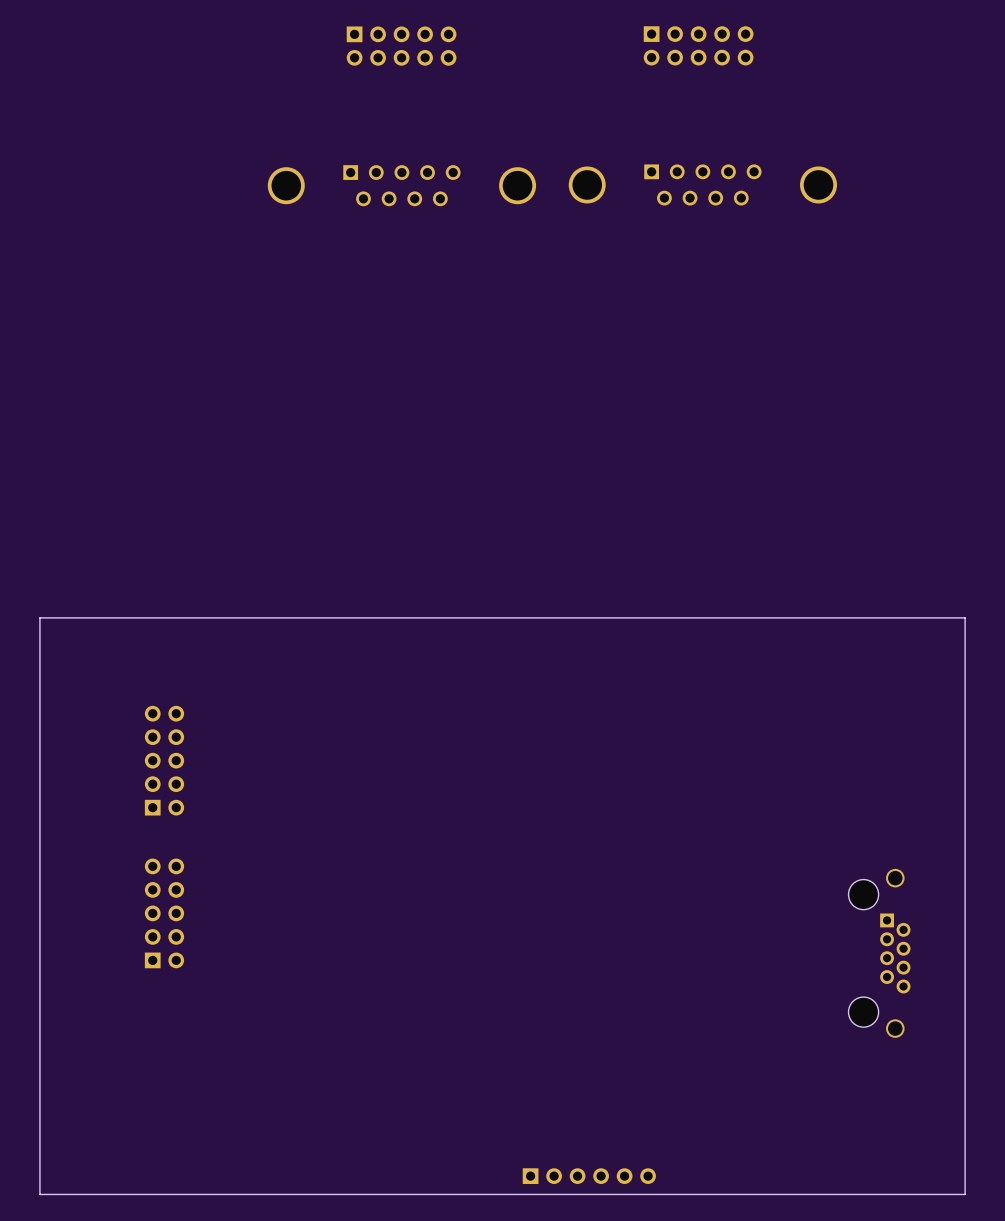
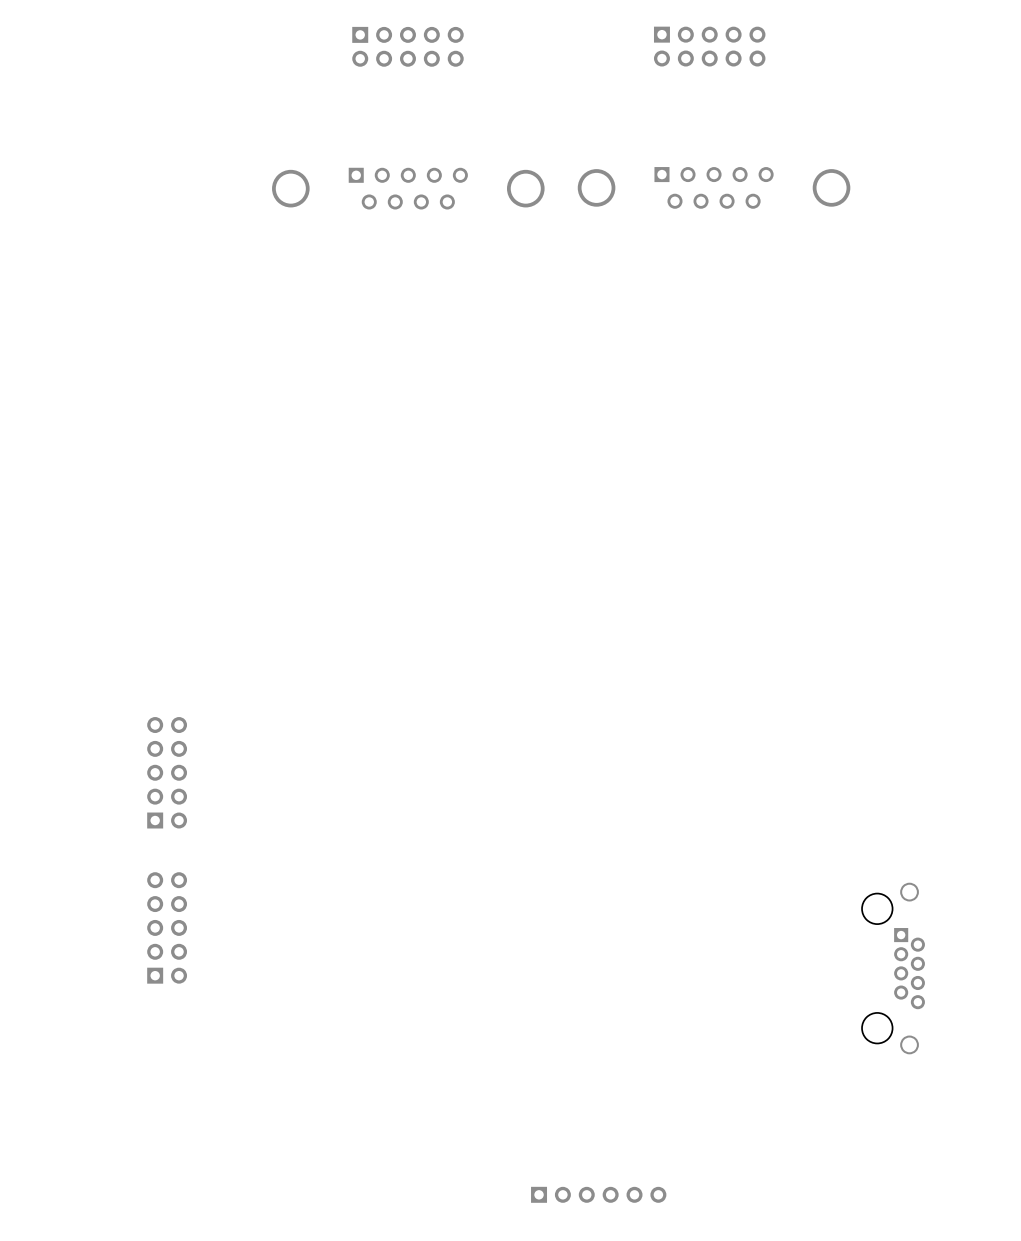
board edge: (965, 617) (39, 617) (39, 1194) (965, 1194) (965, 617) -> none

